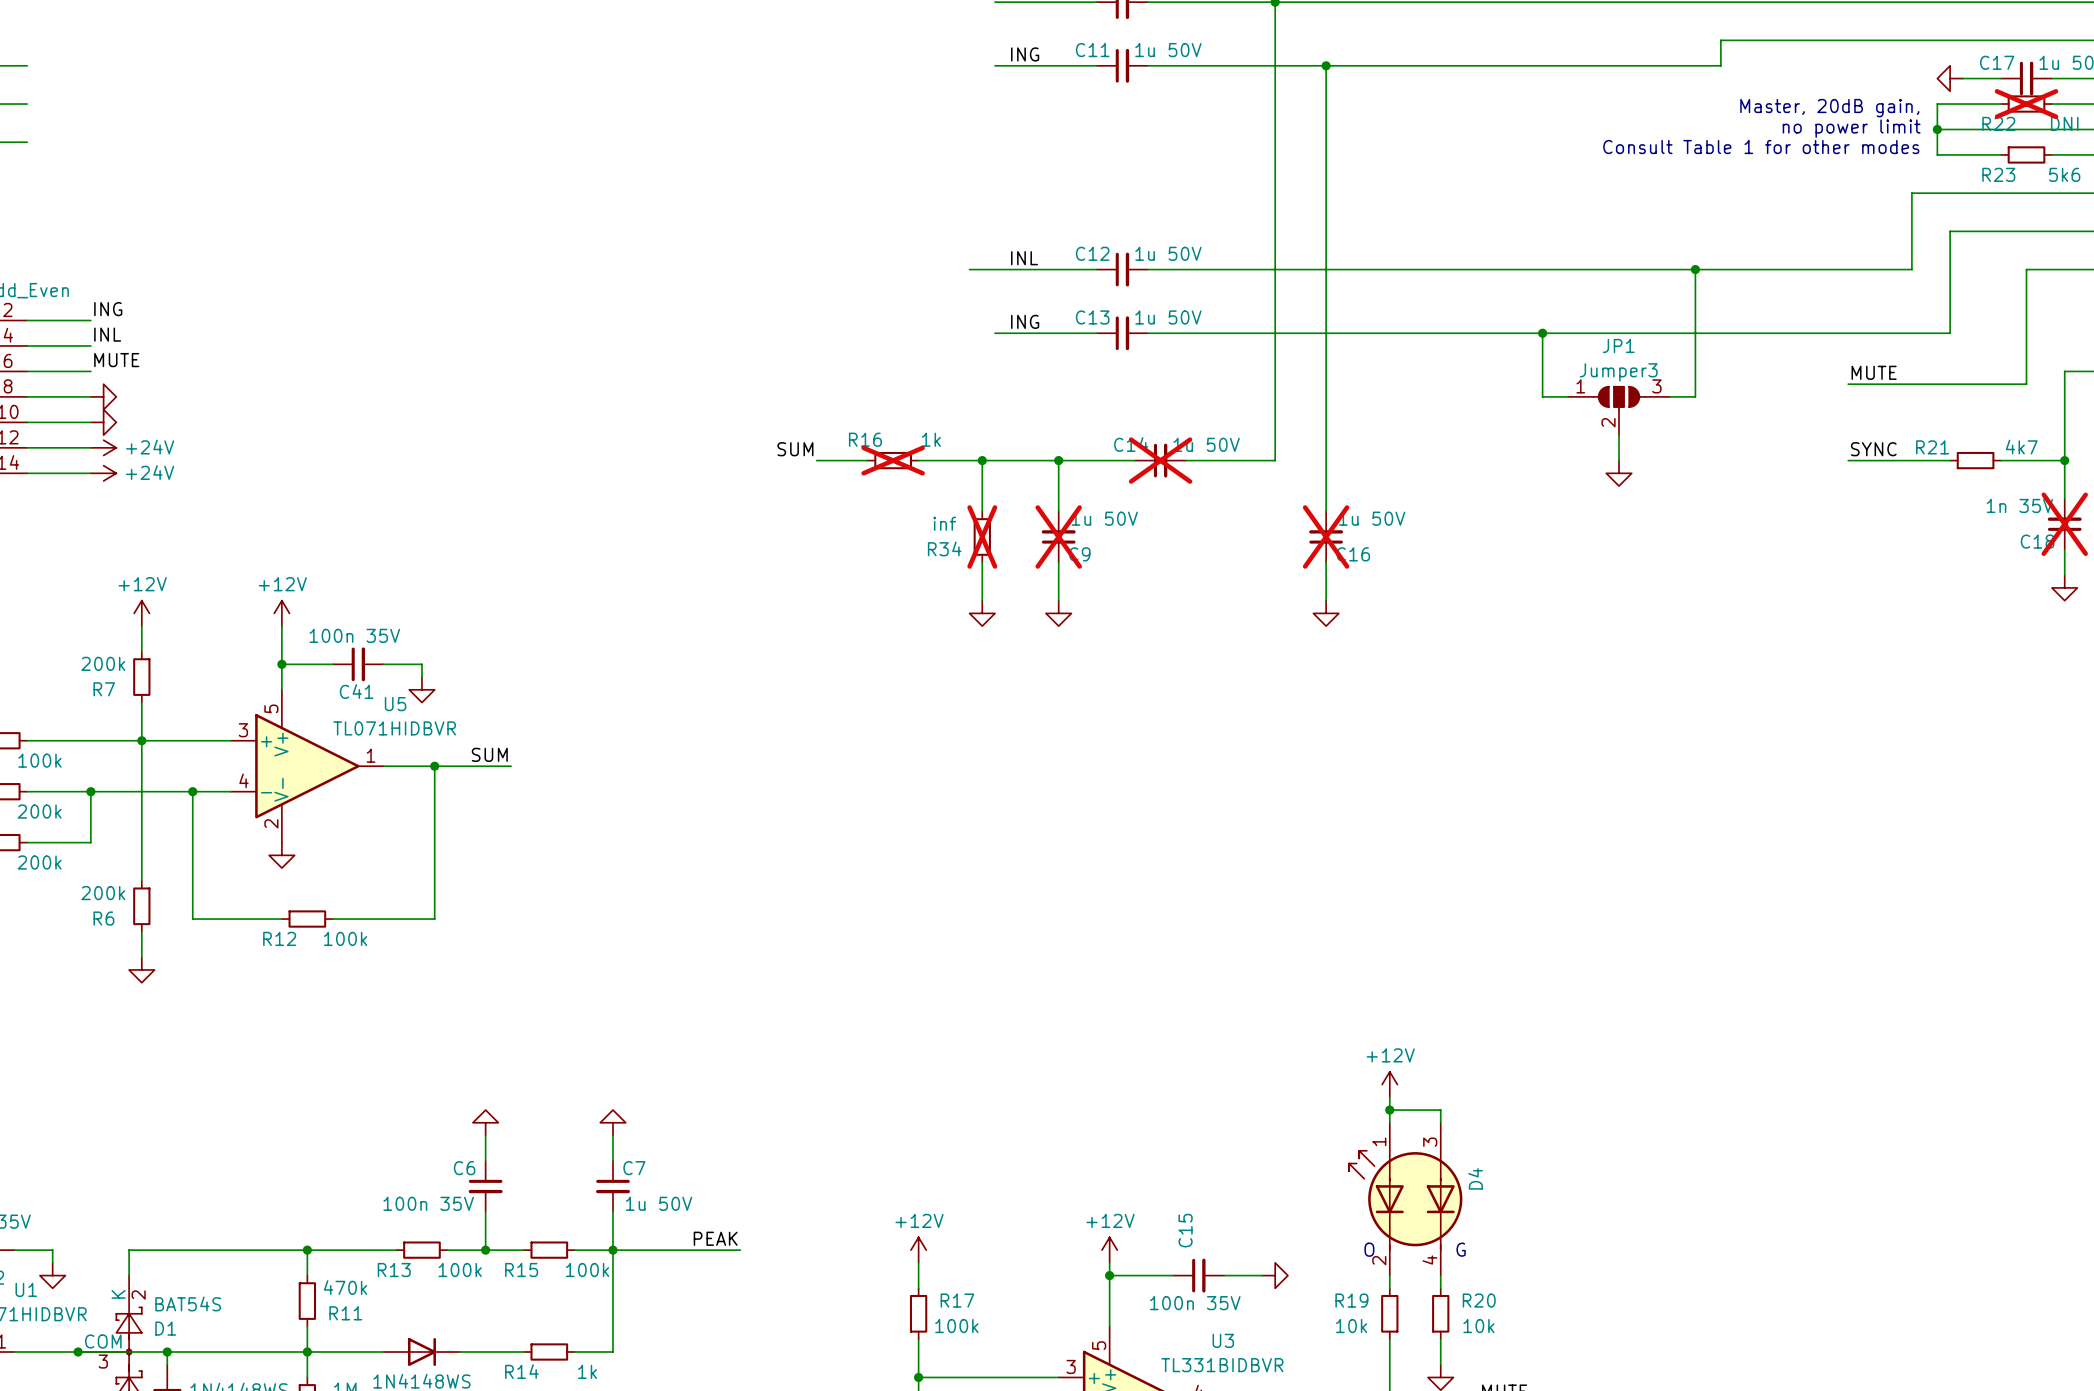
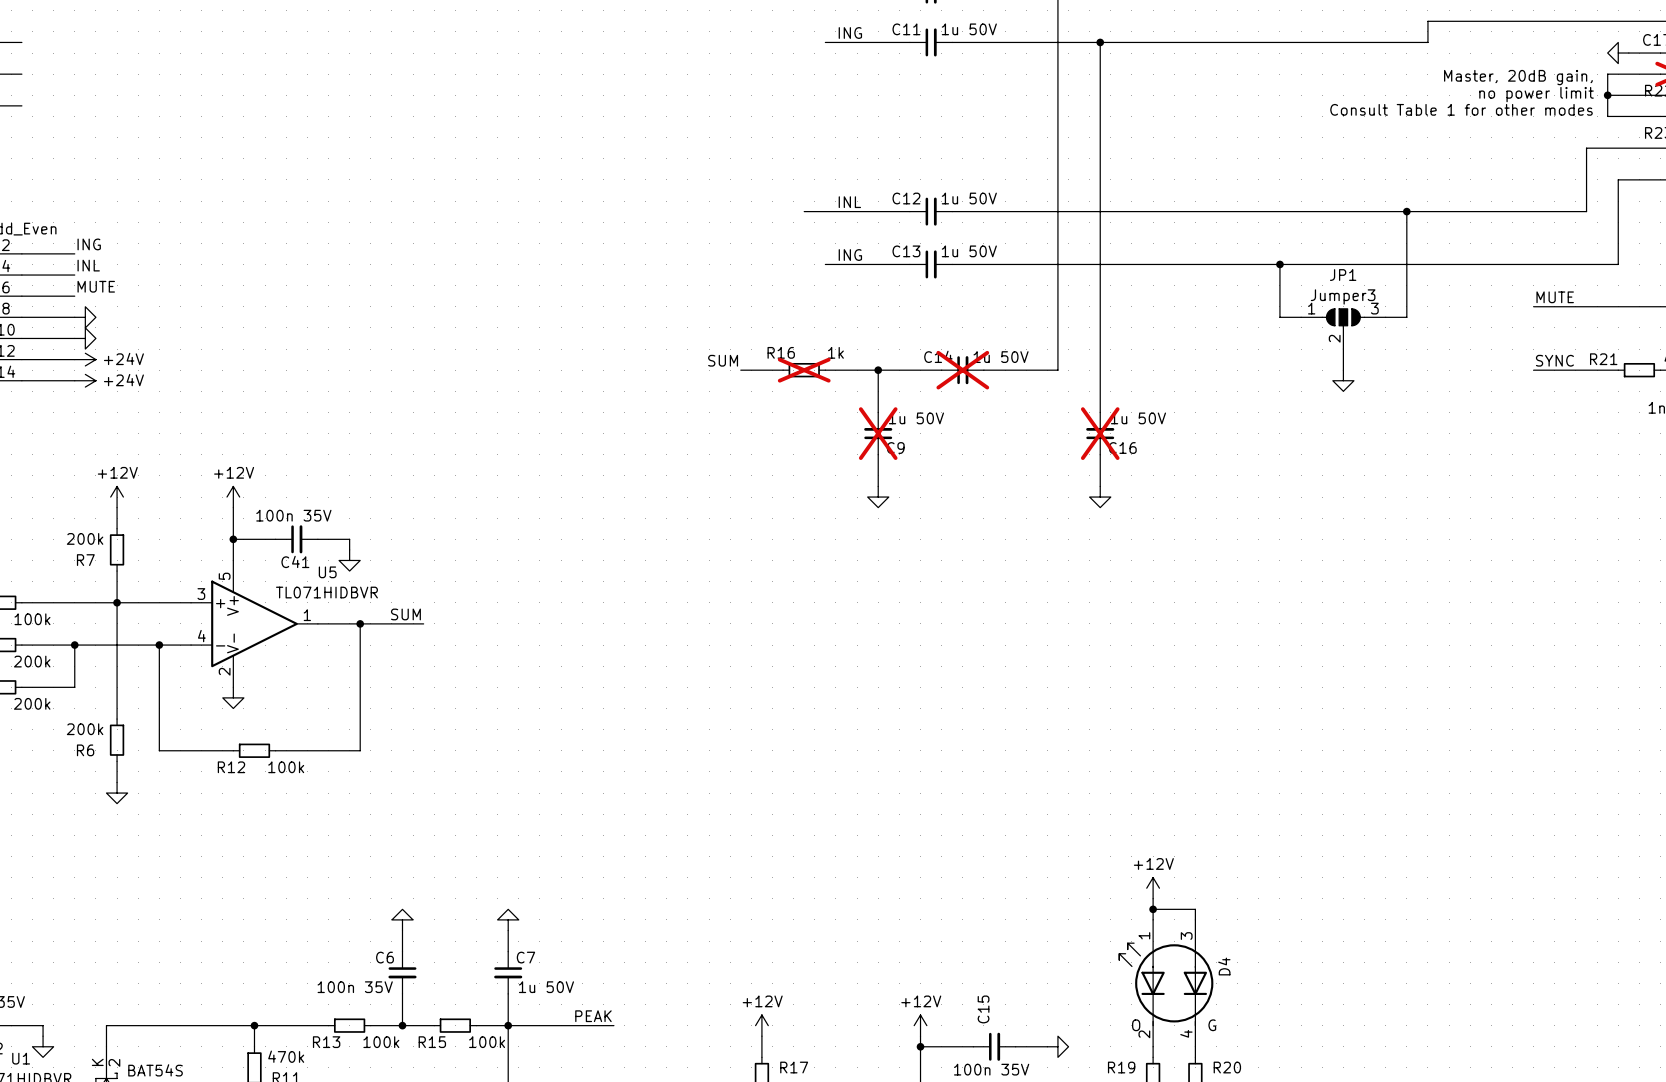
label position: SUM (795, 449) -> SUM (723, 360)
wire: (816, 460) (867, 460) -> none
R16 position: (893, 460) -> (804, 370)
wire: (982, 460) (982, 511) -> none
junction: (982, 460) -> none
R34: inf (982, 536) -> none
wire: (982, 562) (982, 600) -> none
power symbol: (982, 613) -> none

